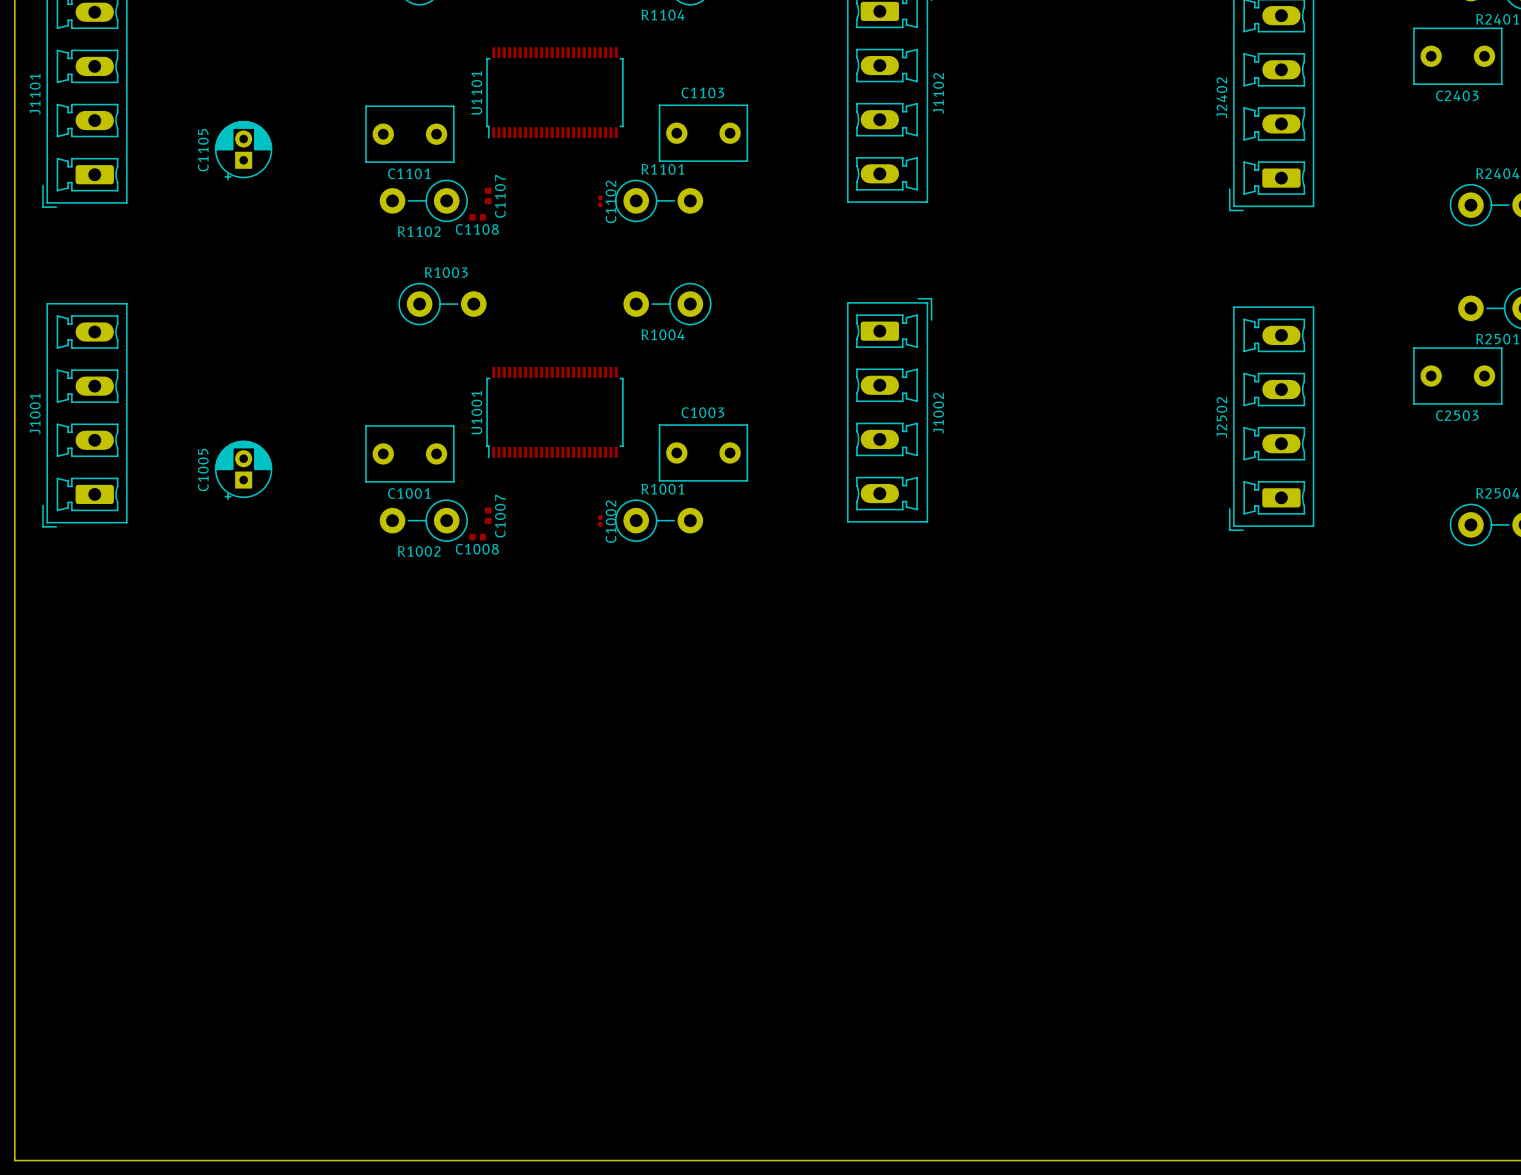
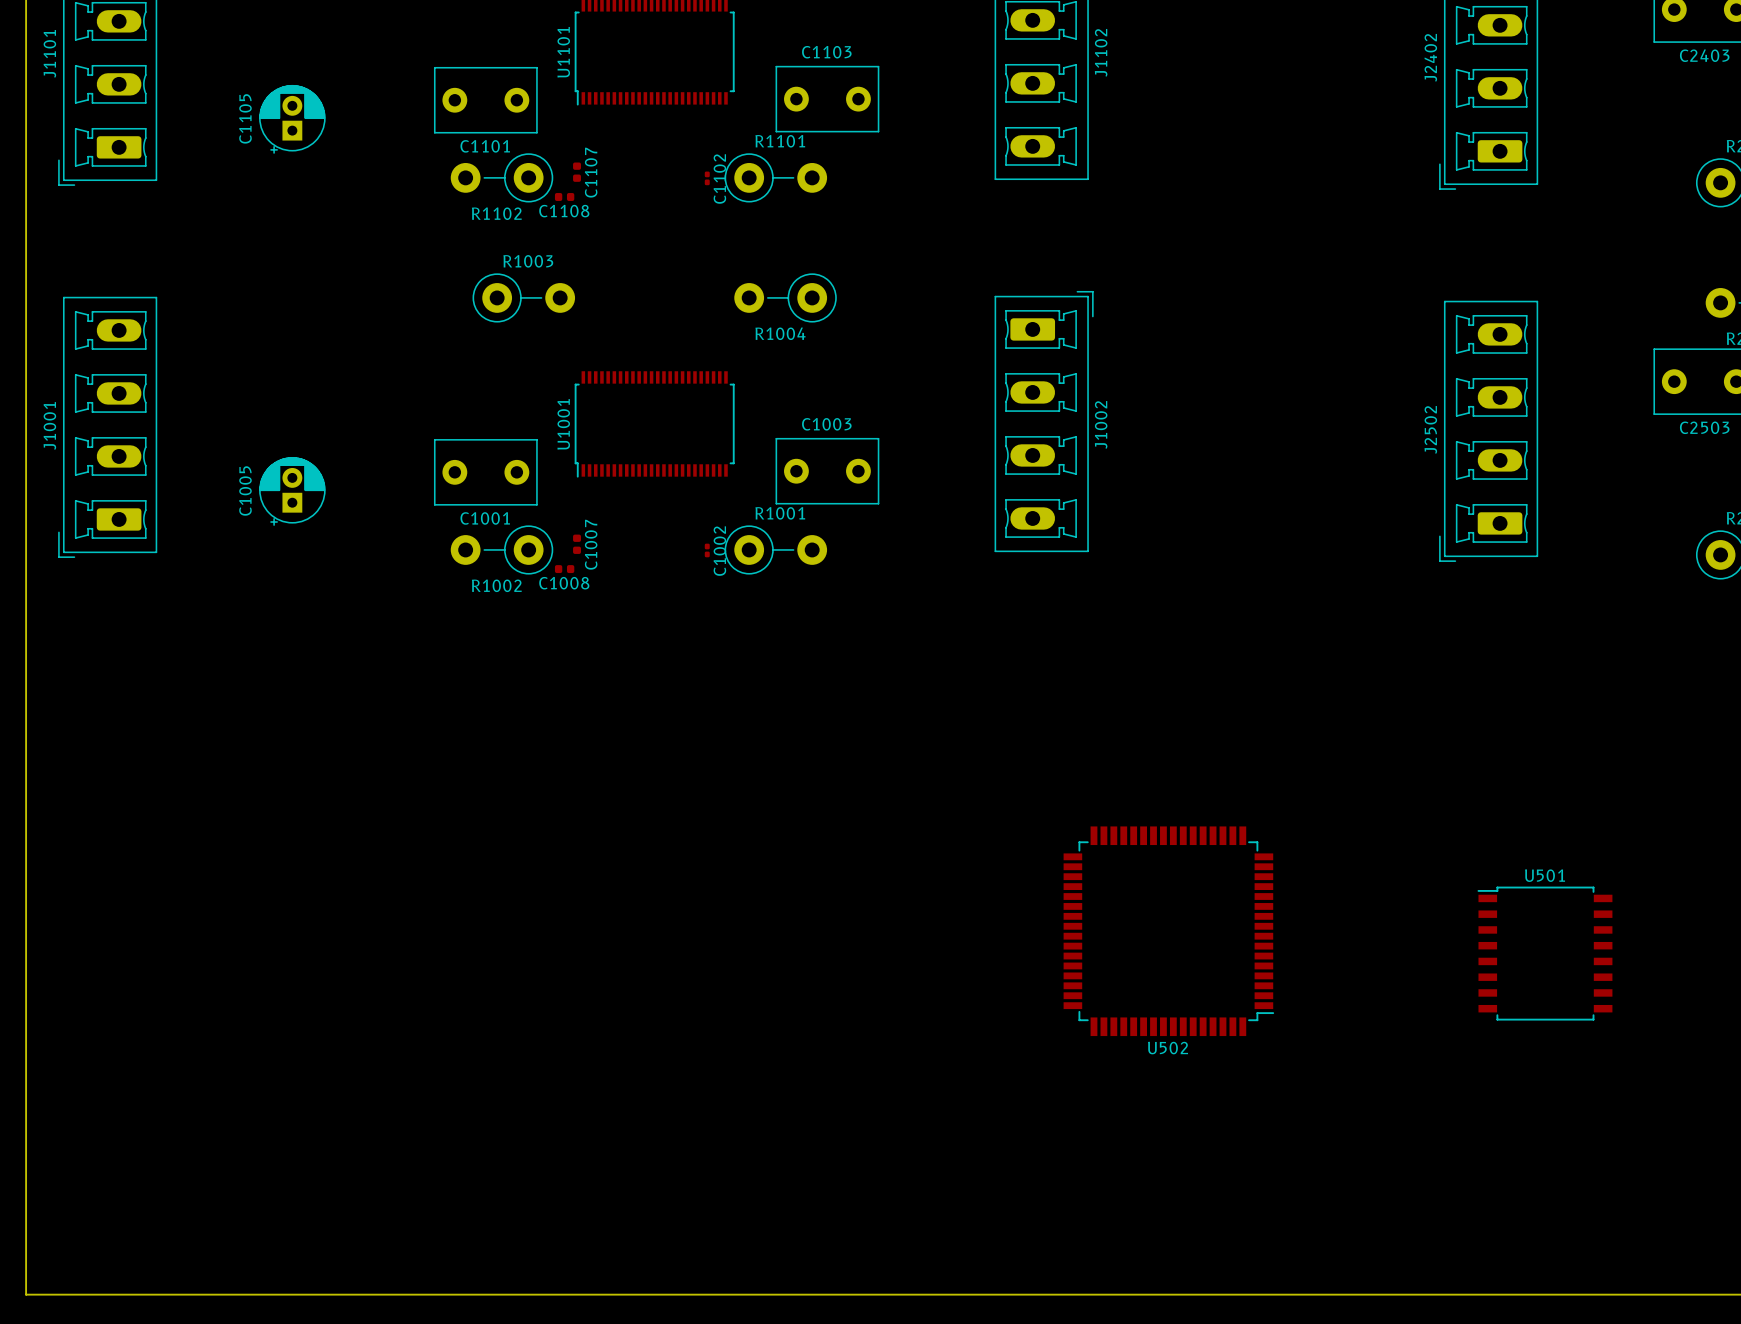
U502: none -> (1168, 931)
U501: none -> (1544, 953)

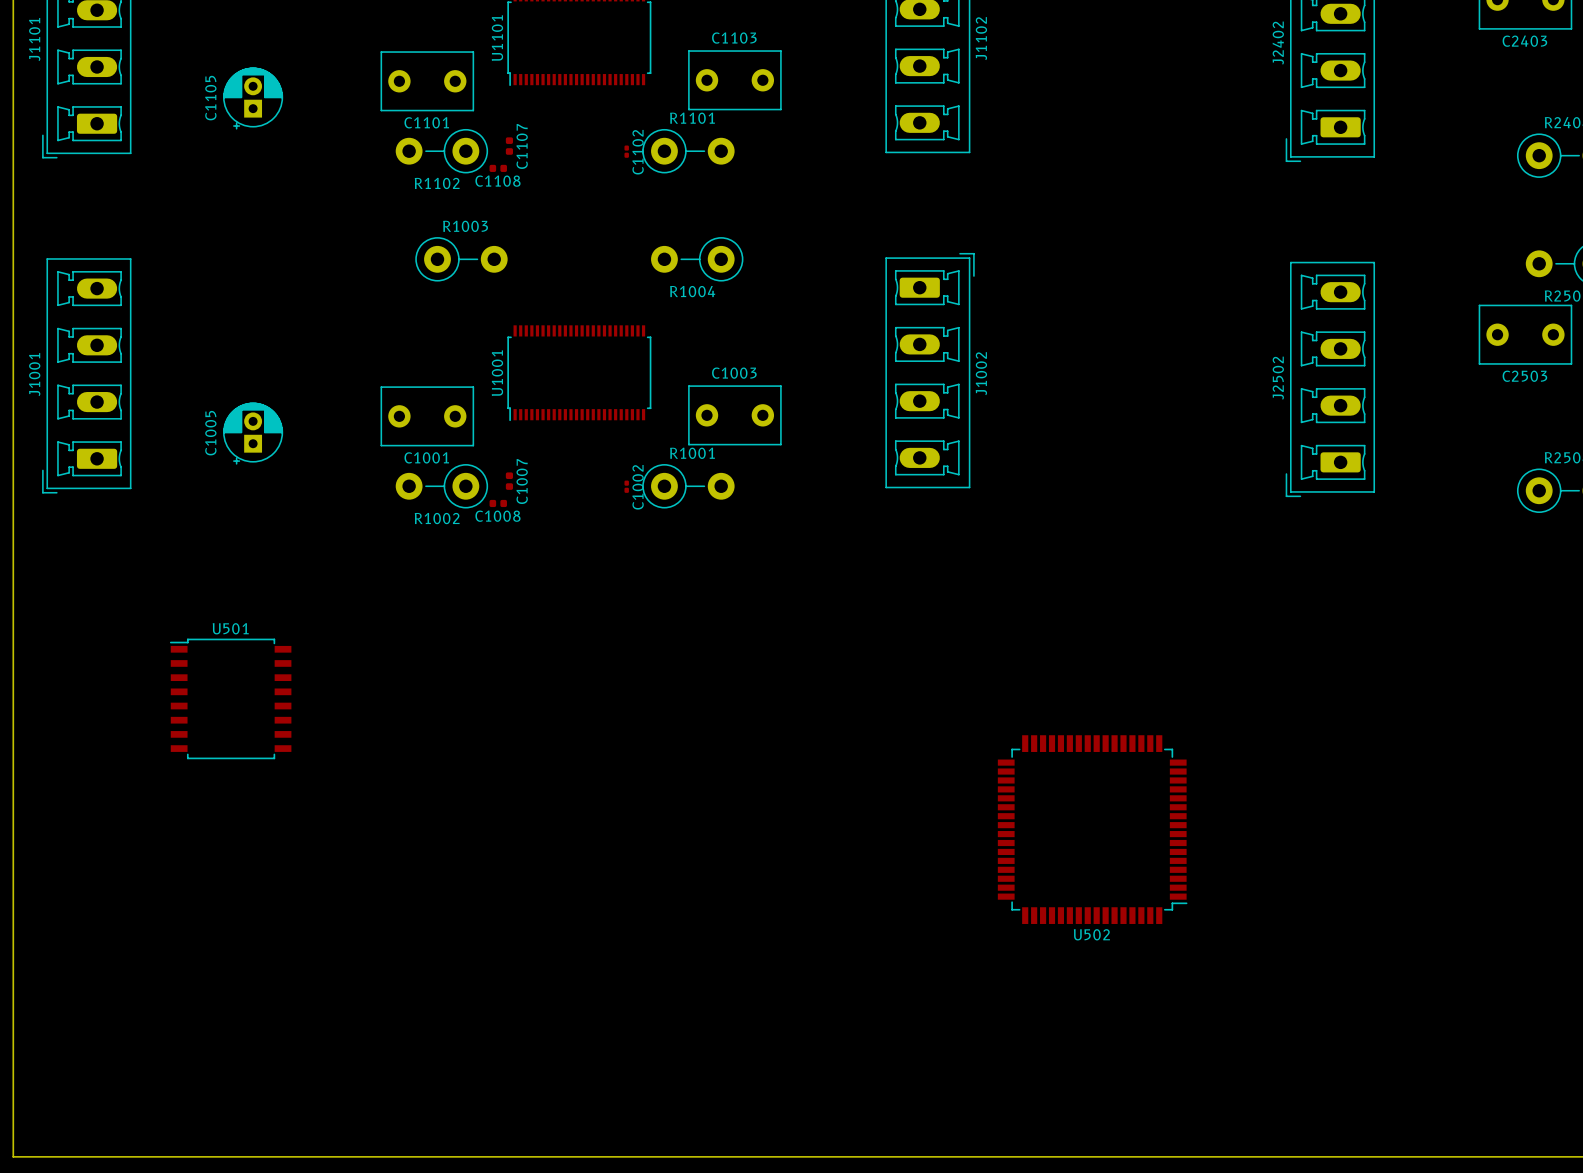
U502 position: (1168, 931) -> (1092, 829)
U501 position: (1544, 953) -> (230, 698)

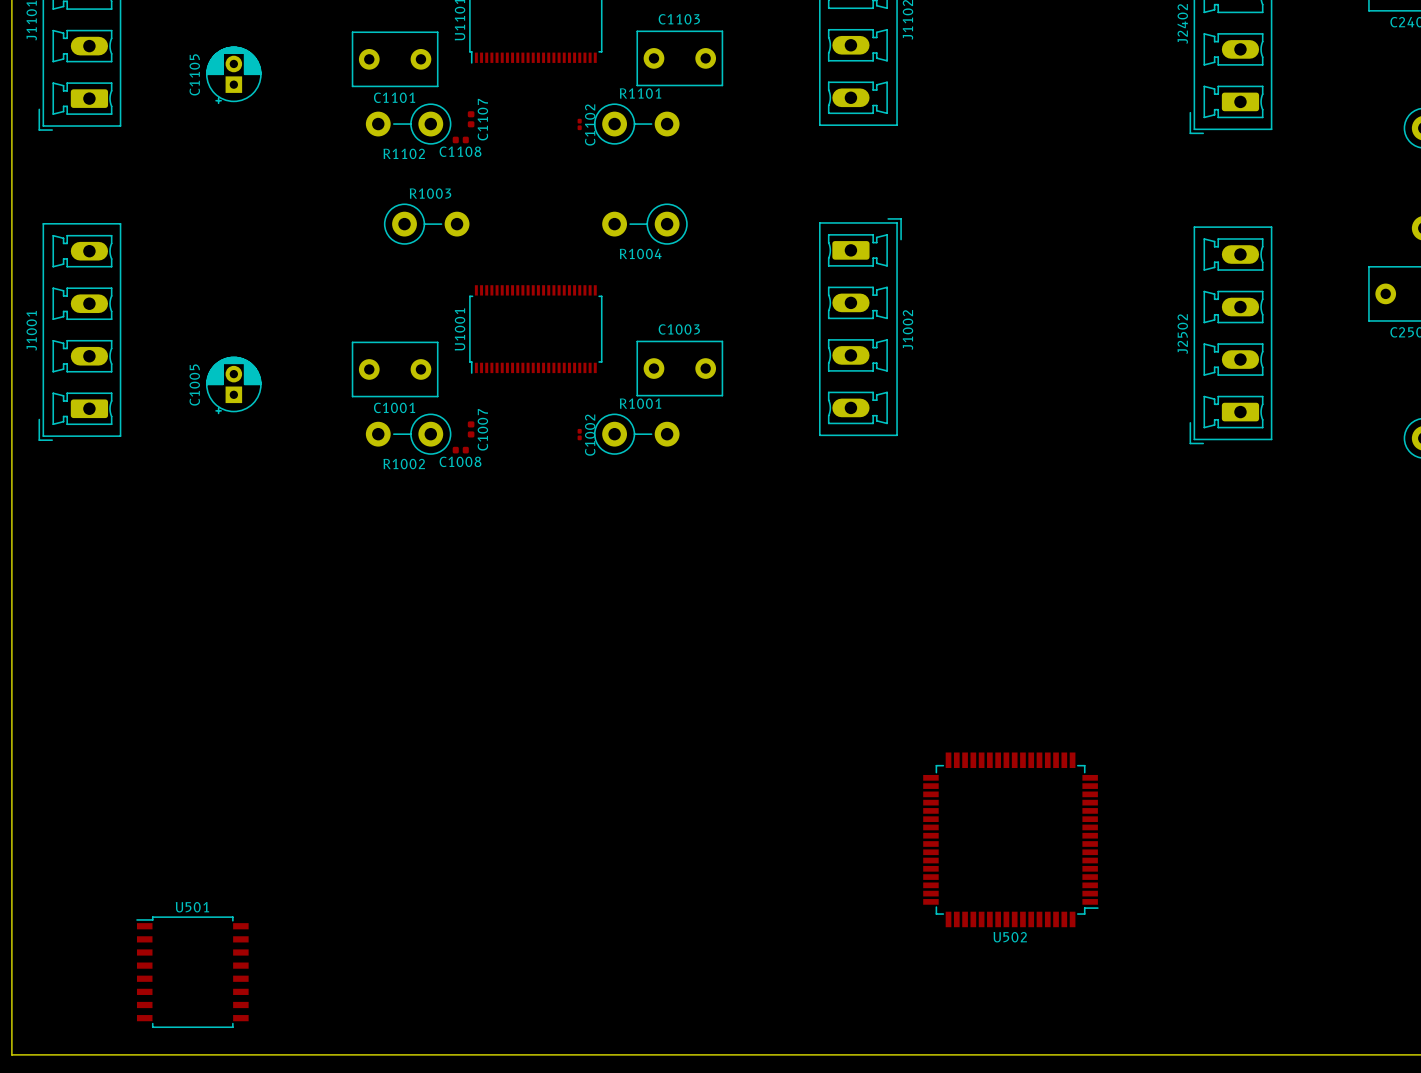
U501 position: (230, 698) -> (192, 972)
U502 position: (1092, 829) -> (1010, 839)

